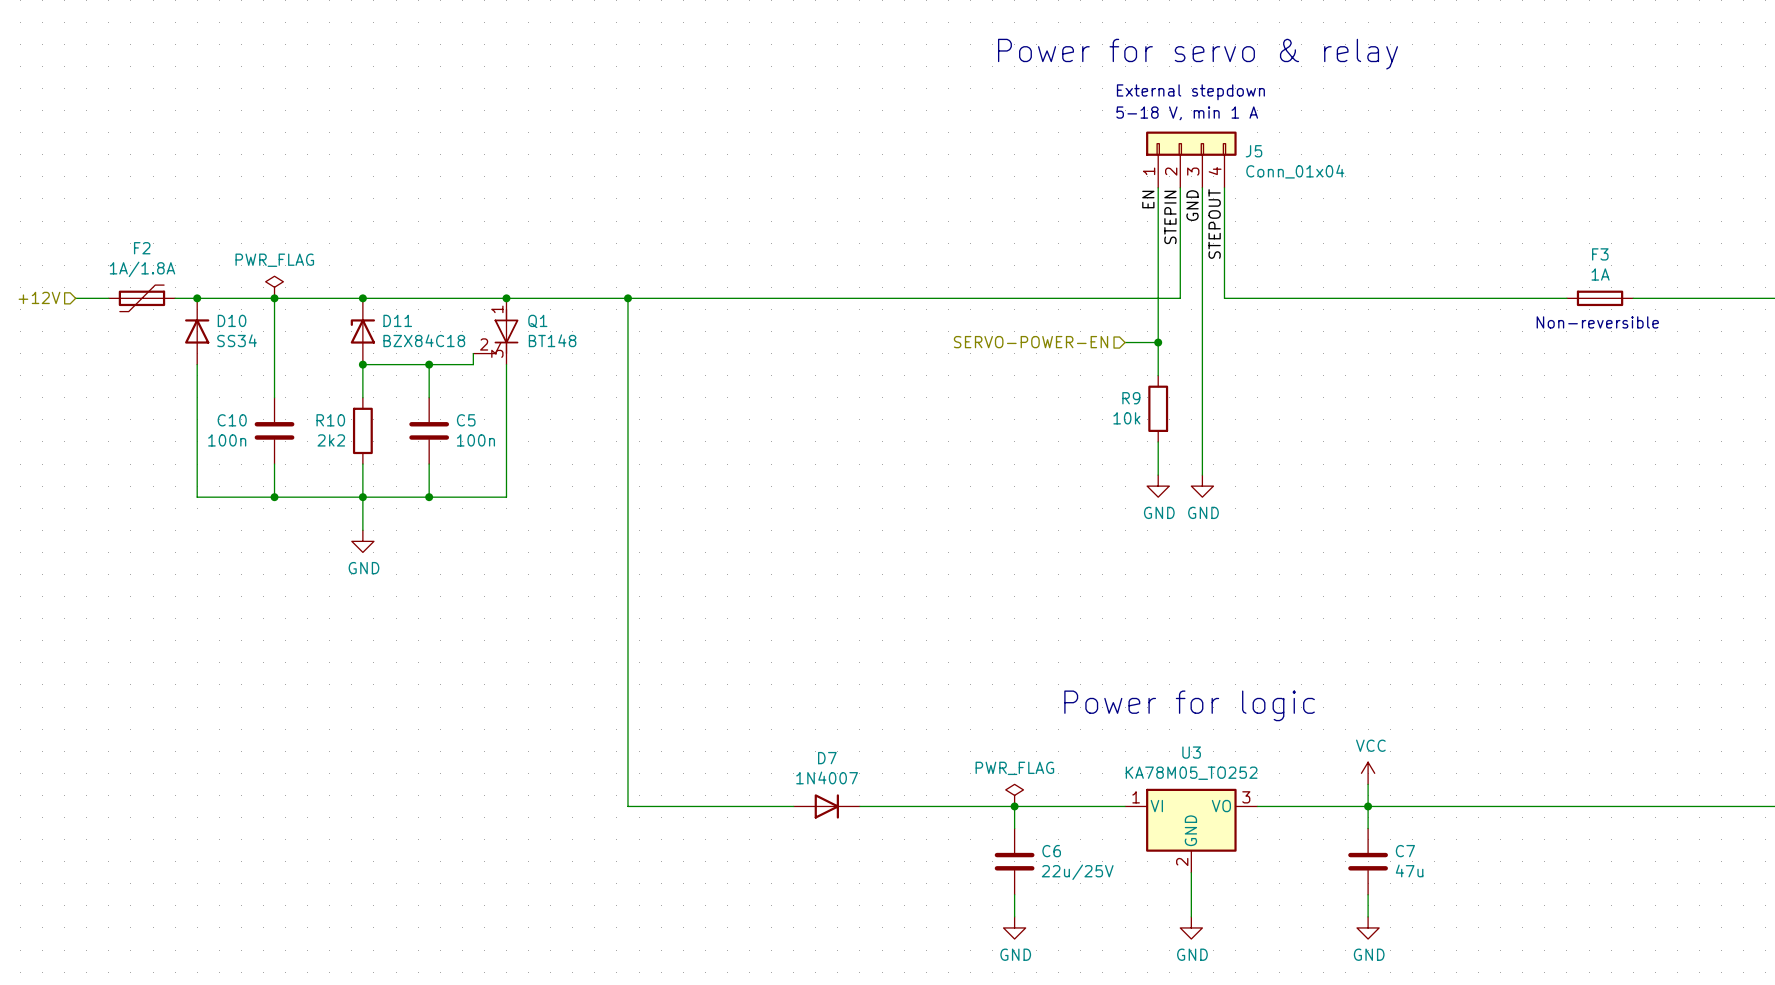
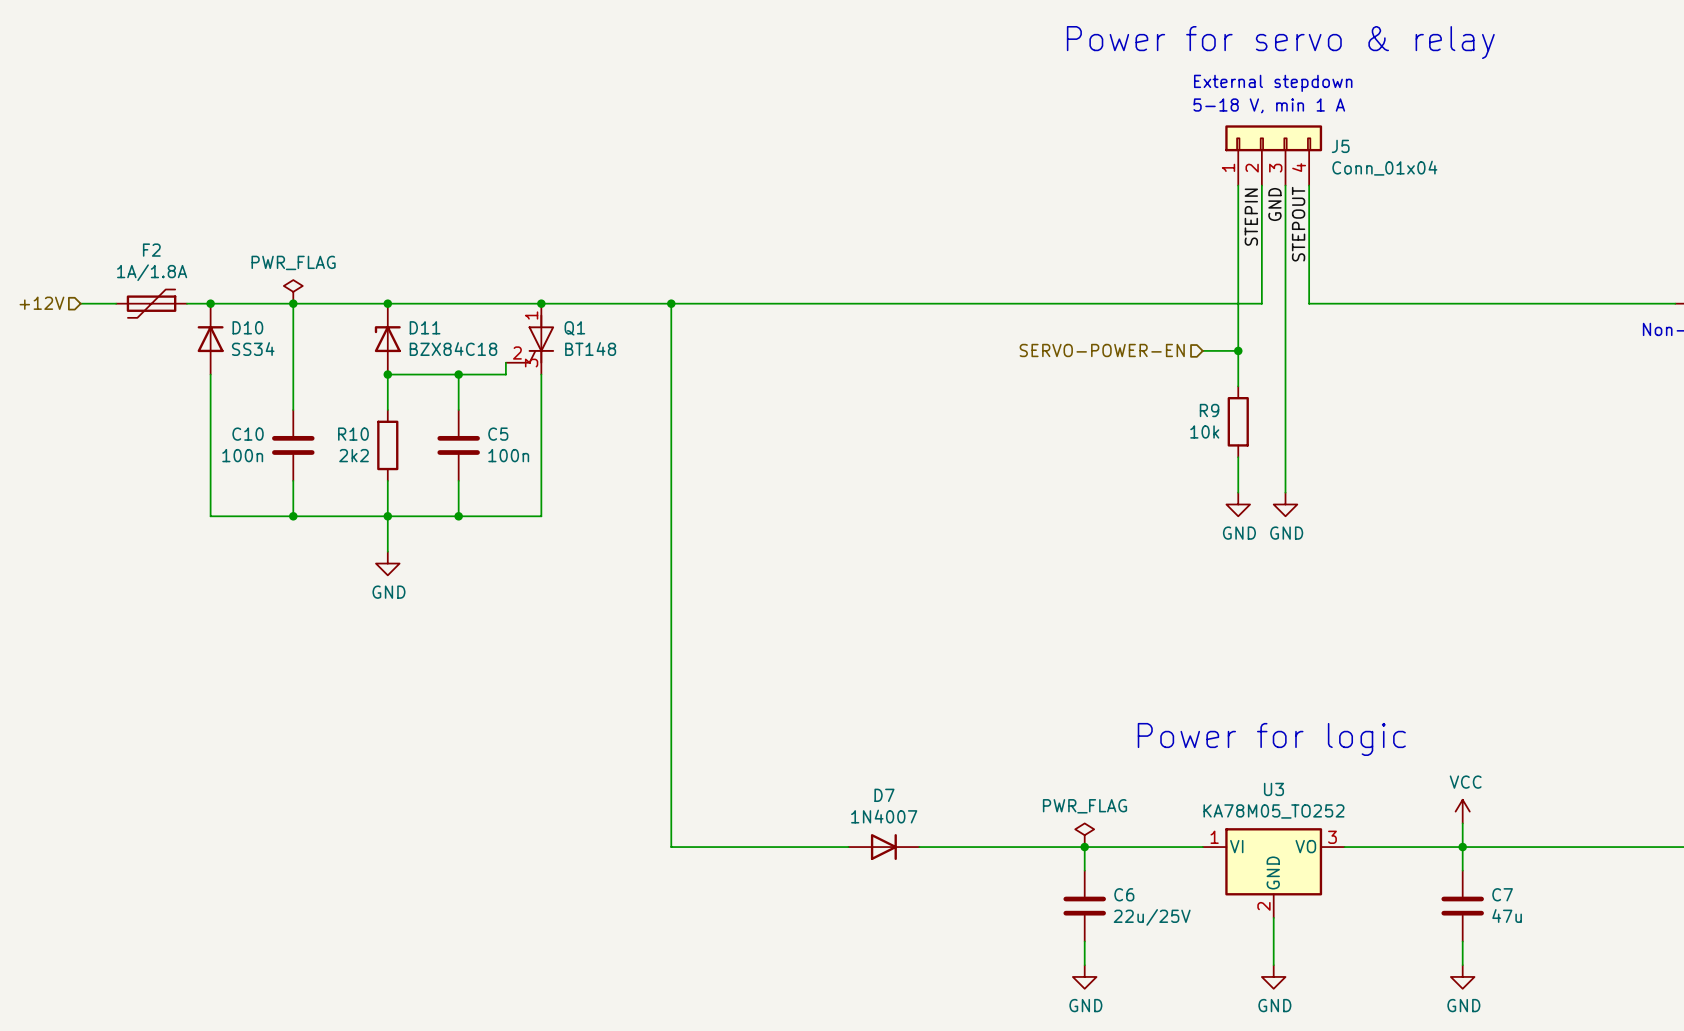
label: EN (1148, 199) -> none

